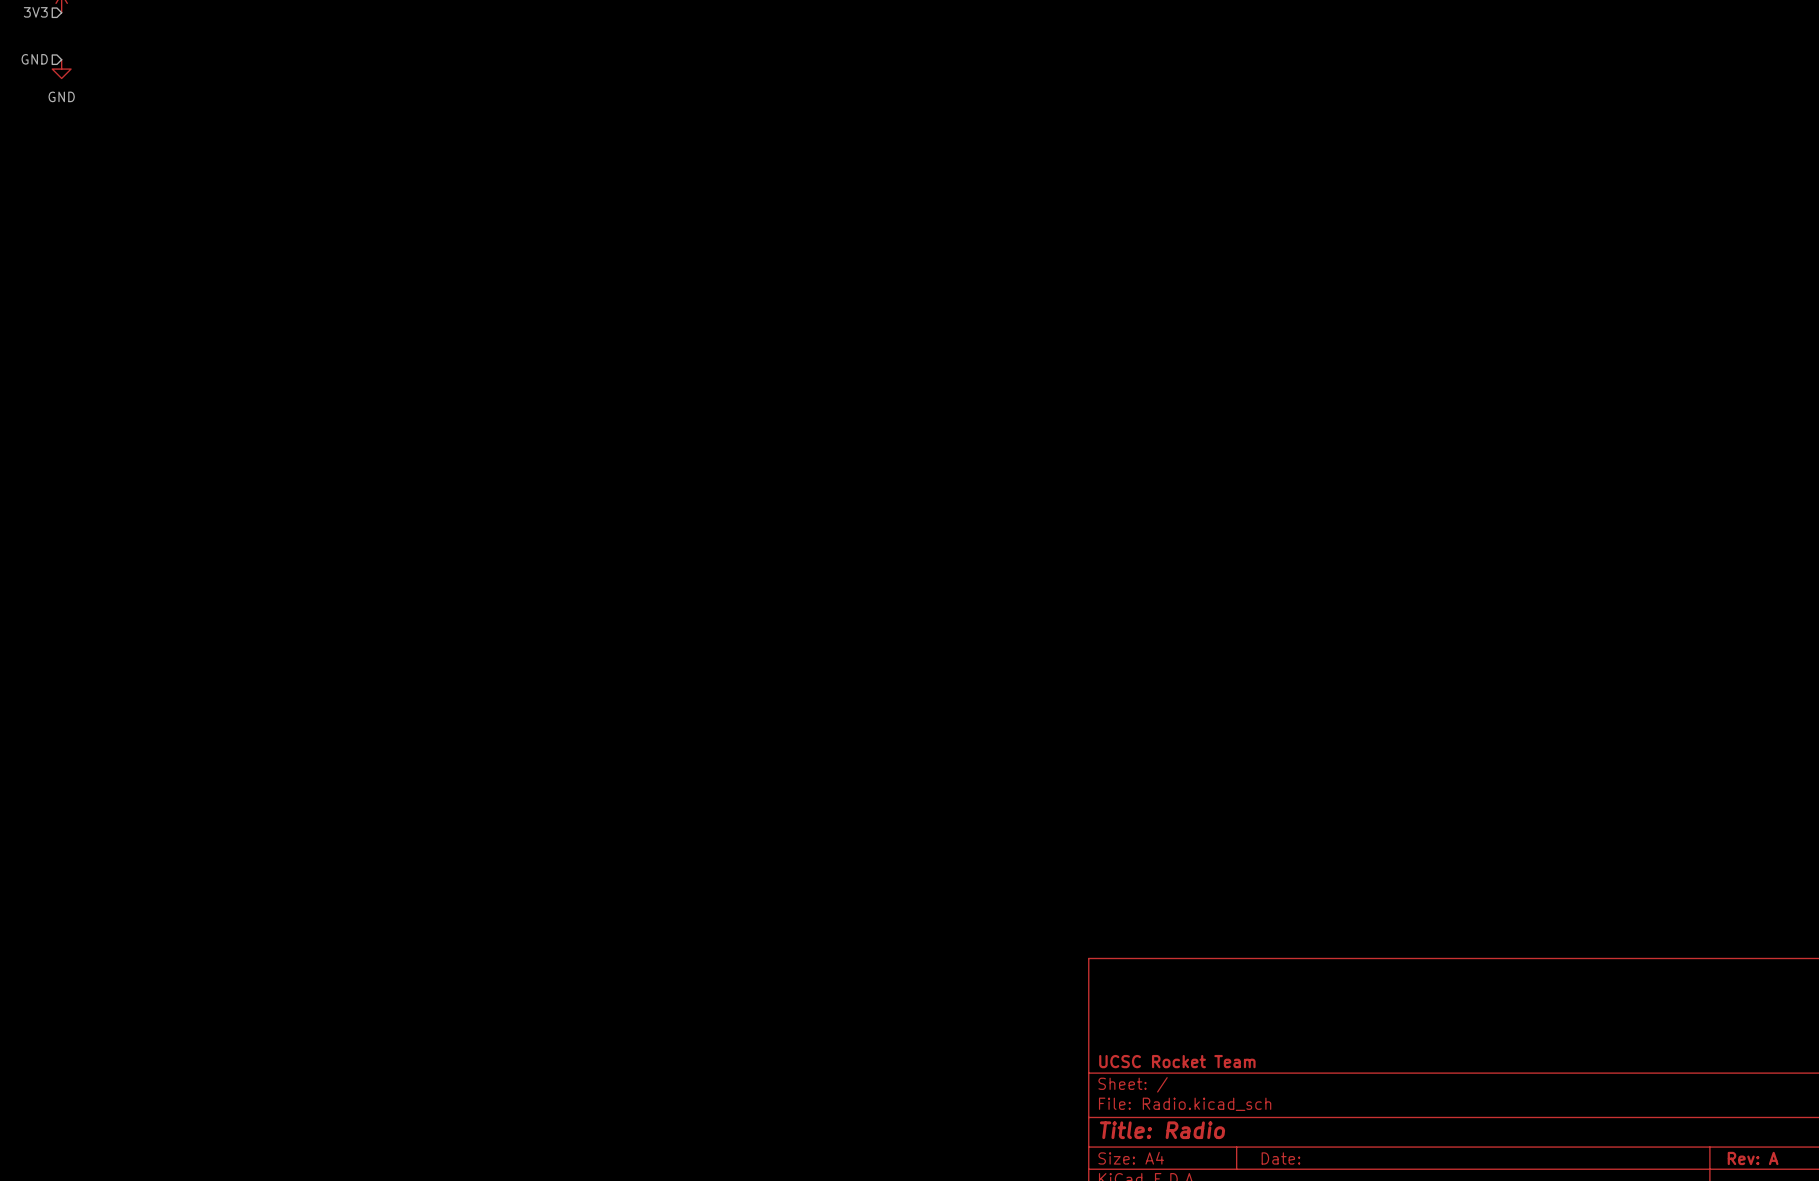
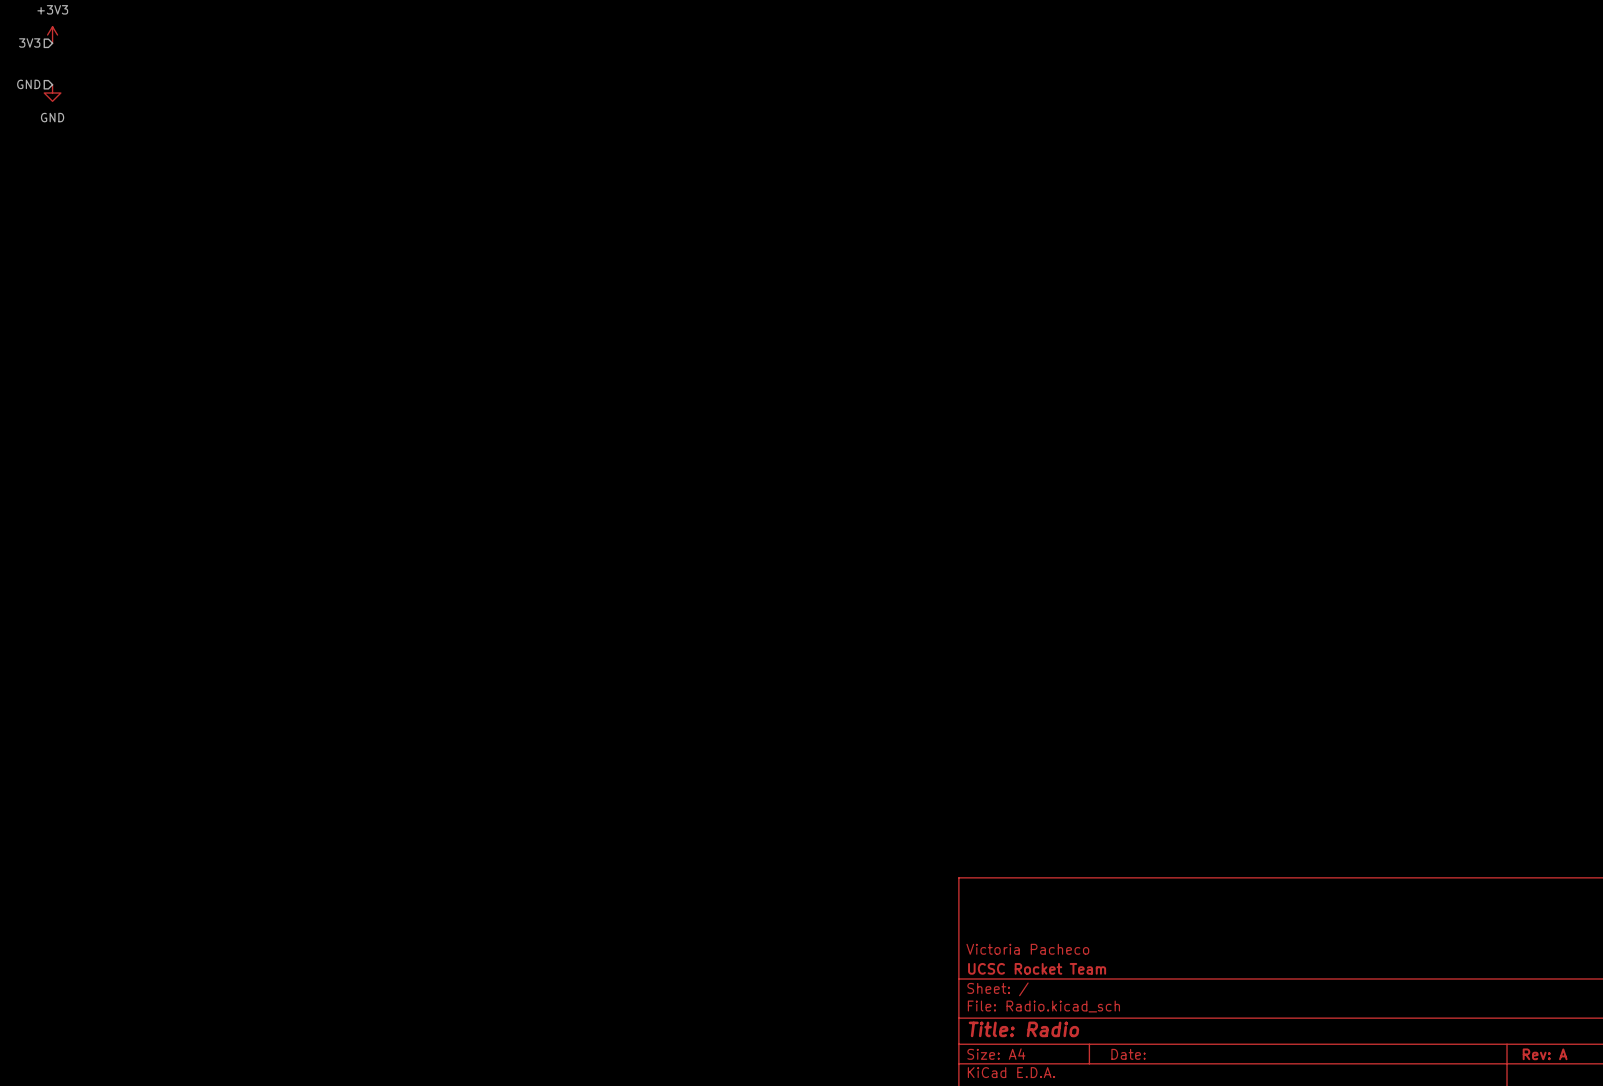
title block: none -> Victoria Pacheco (1027, 949)

